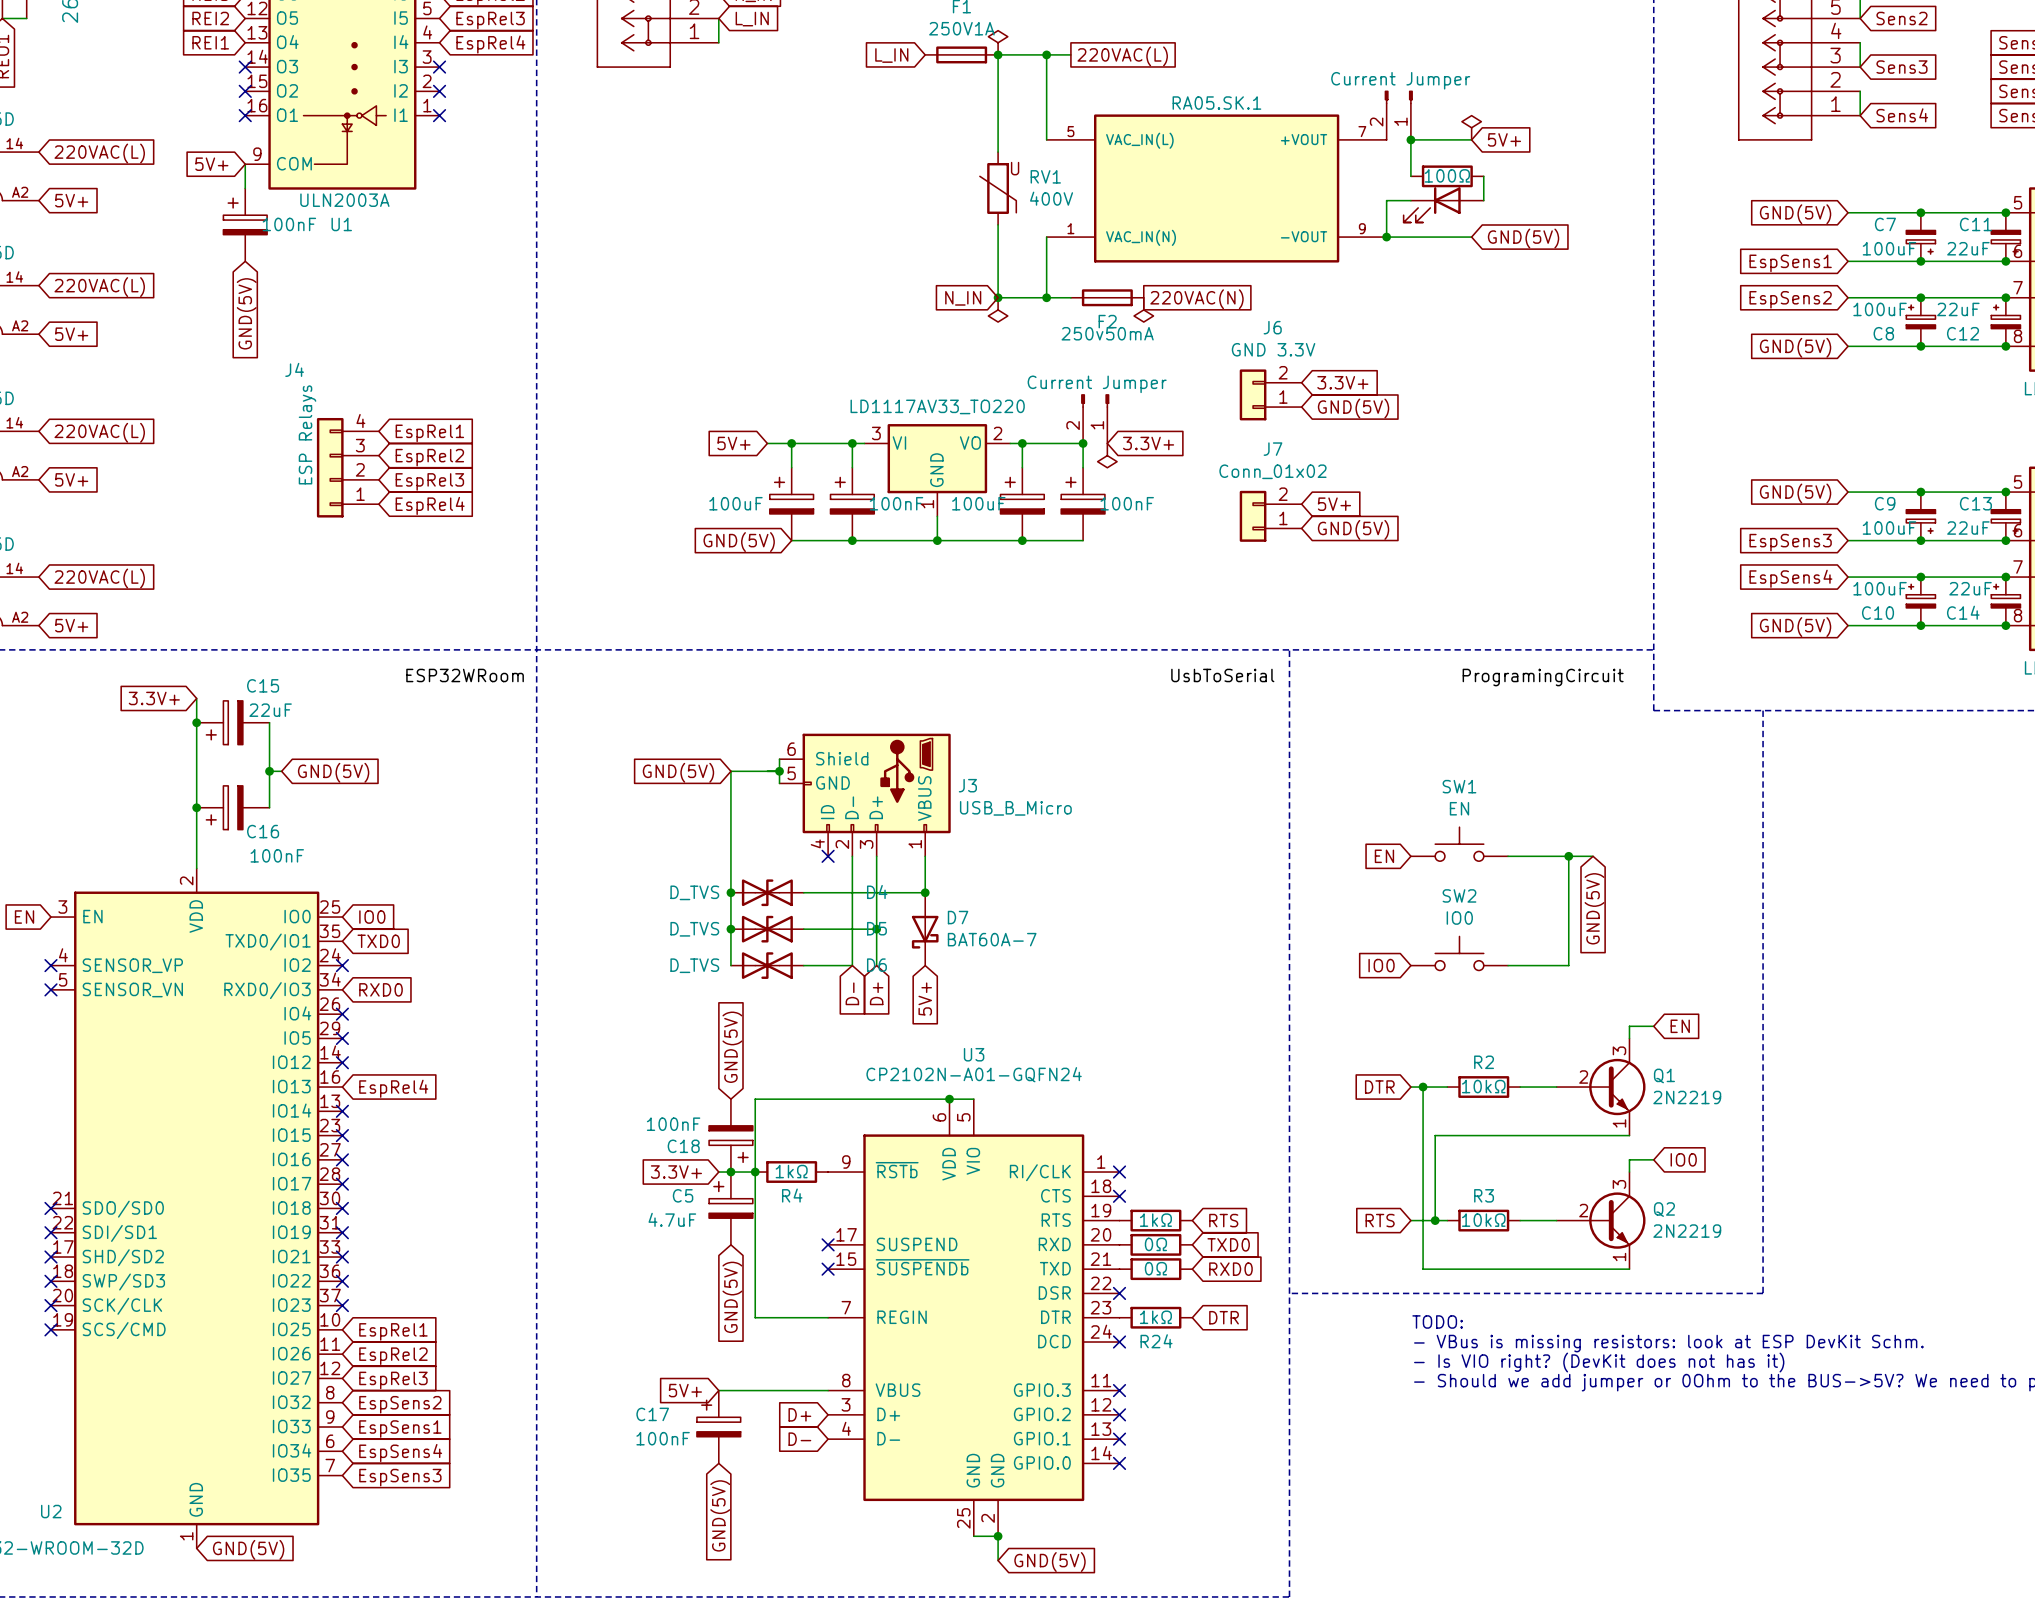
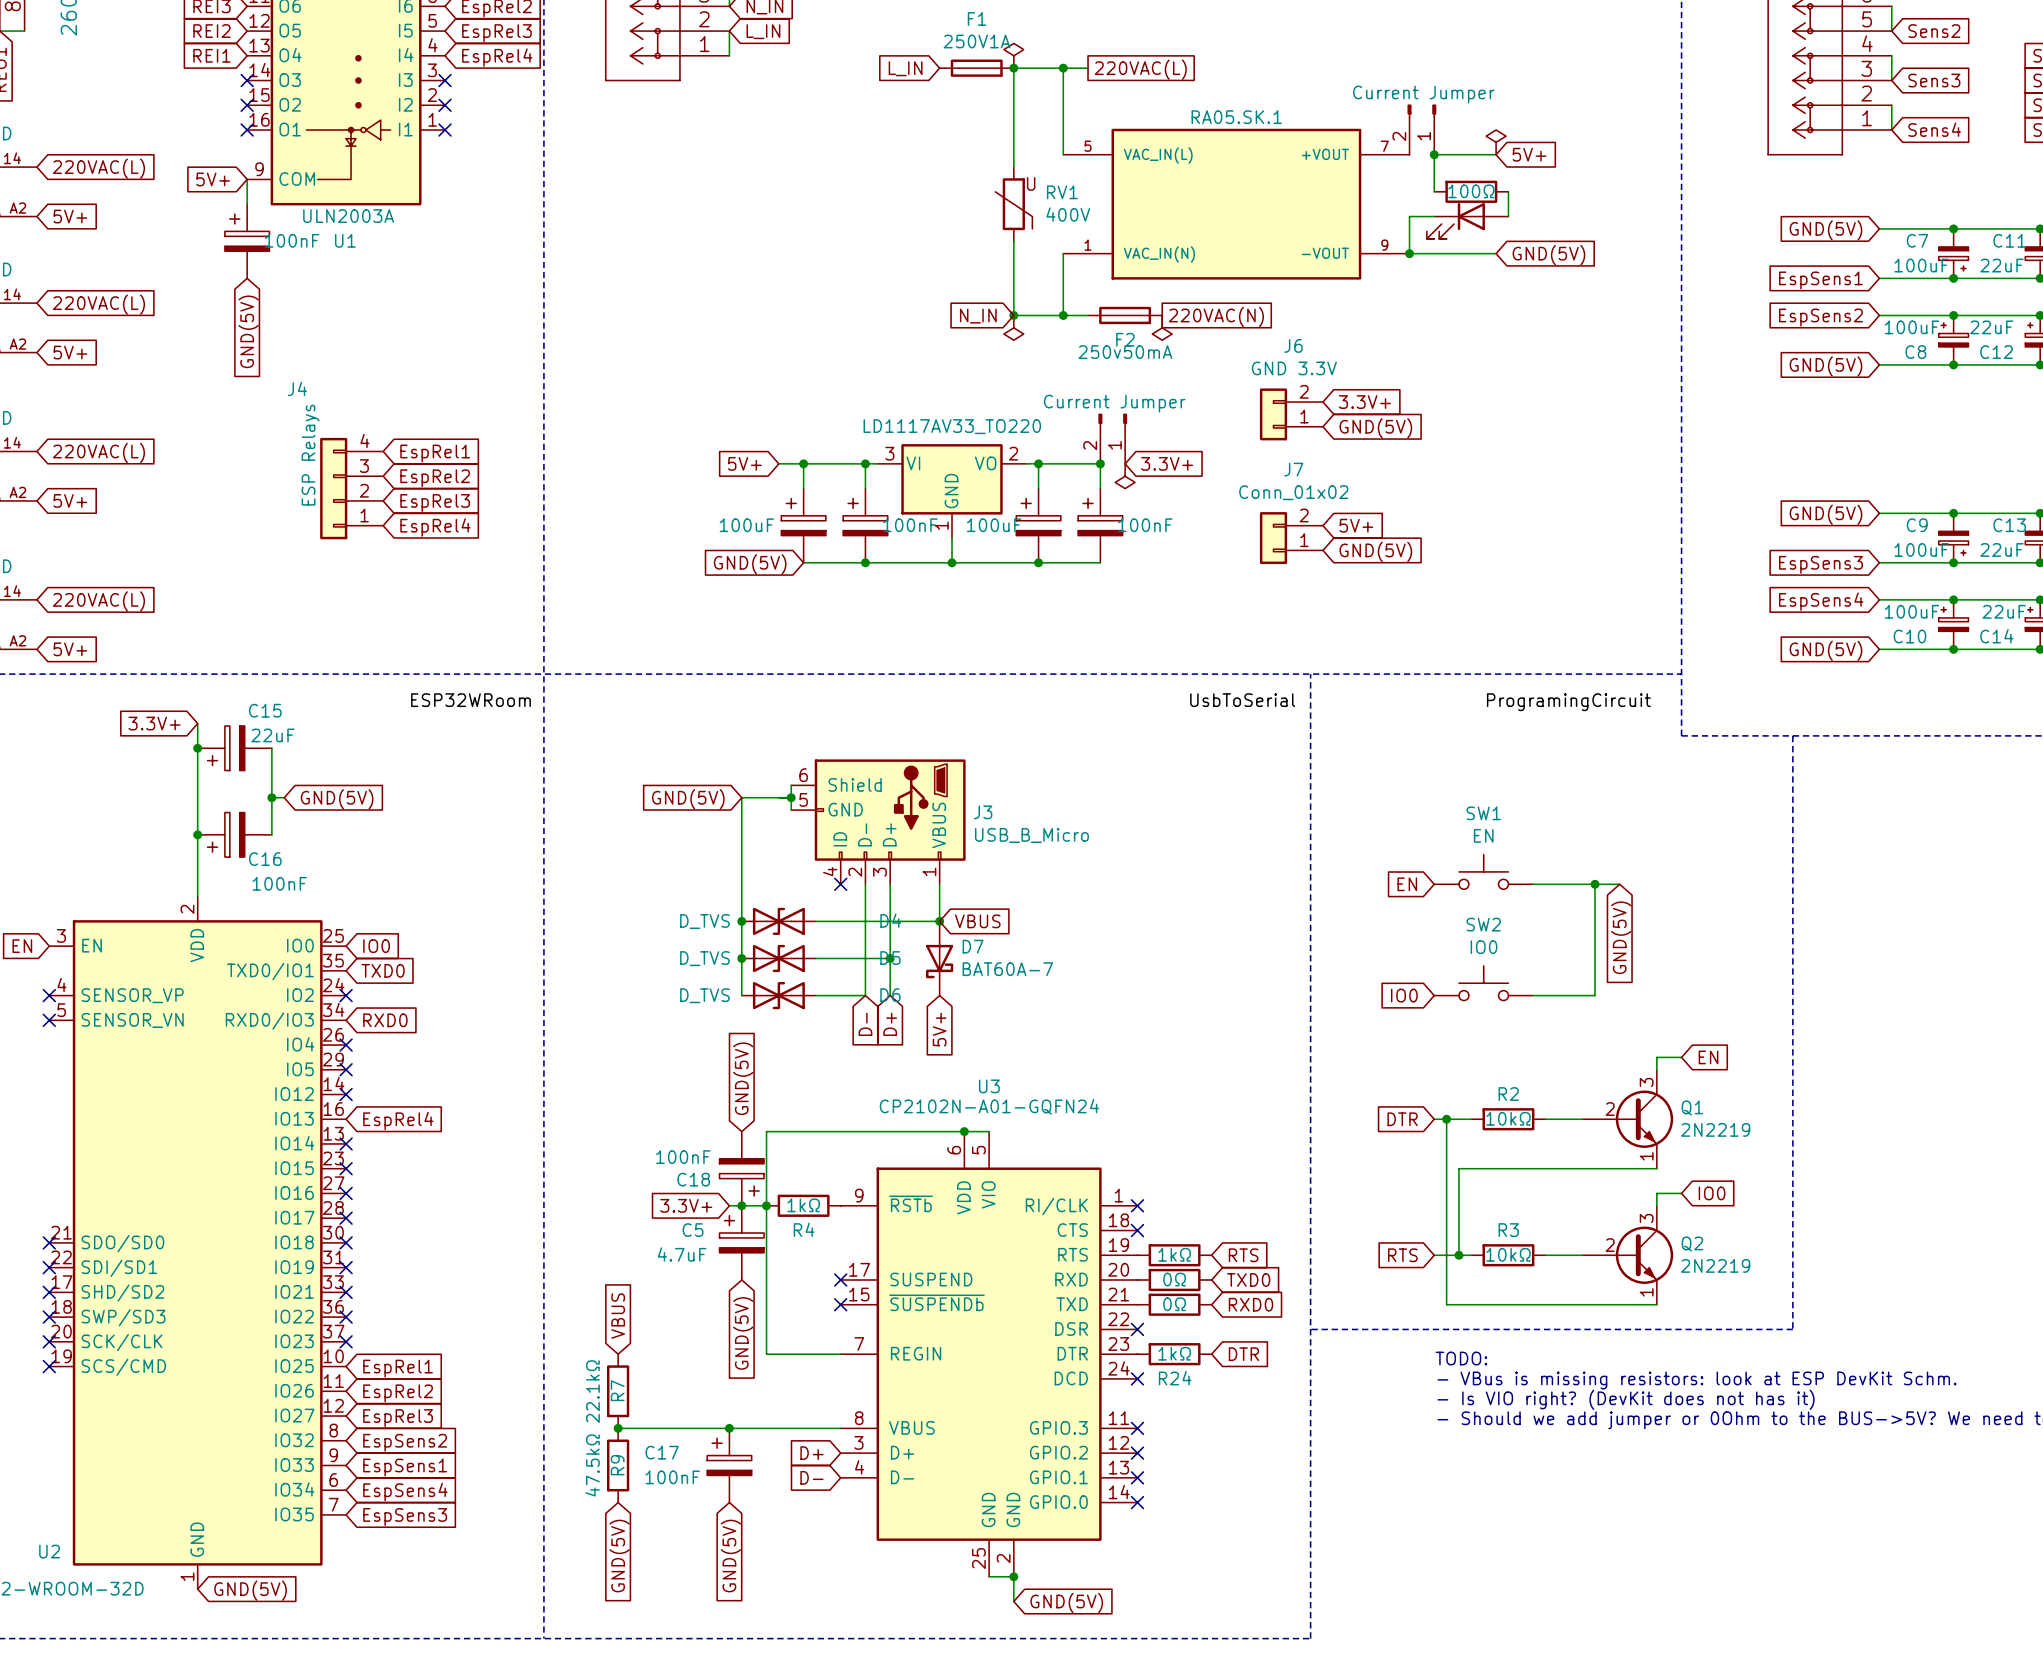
global label: none -> VBUS (977, 921)
global label: none -> VBUS (618, 1316)
R7: none -> 22.1kΩ (618, 1391)
wire: none -> (618, 1428) (729, 1428)
junction: none -> (618, 1428)
global label: 5V+ (685, 1390) -> none
junction: none -> (729, 1428)
R9: none -> 47.5kΩ (618, 1465)
global label: none -> GND(5V) (619, 1556)

